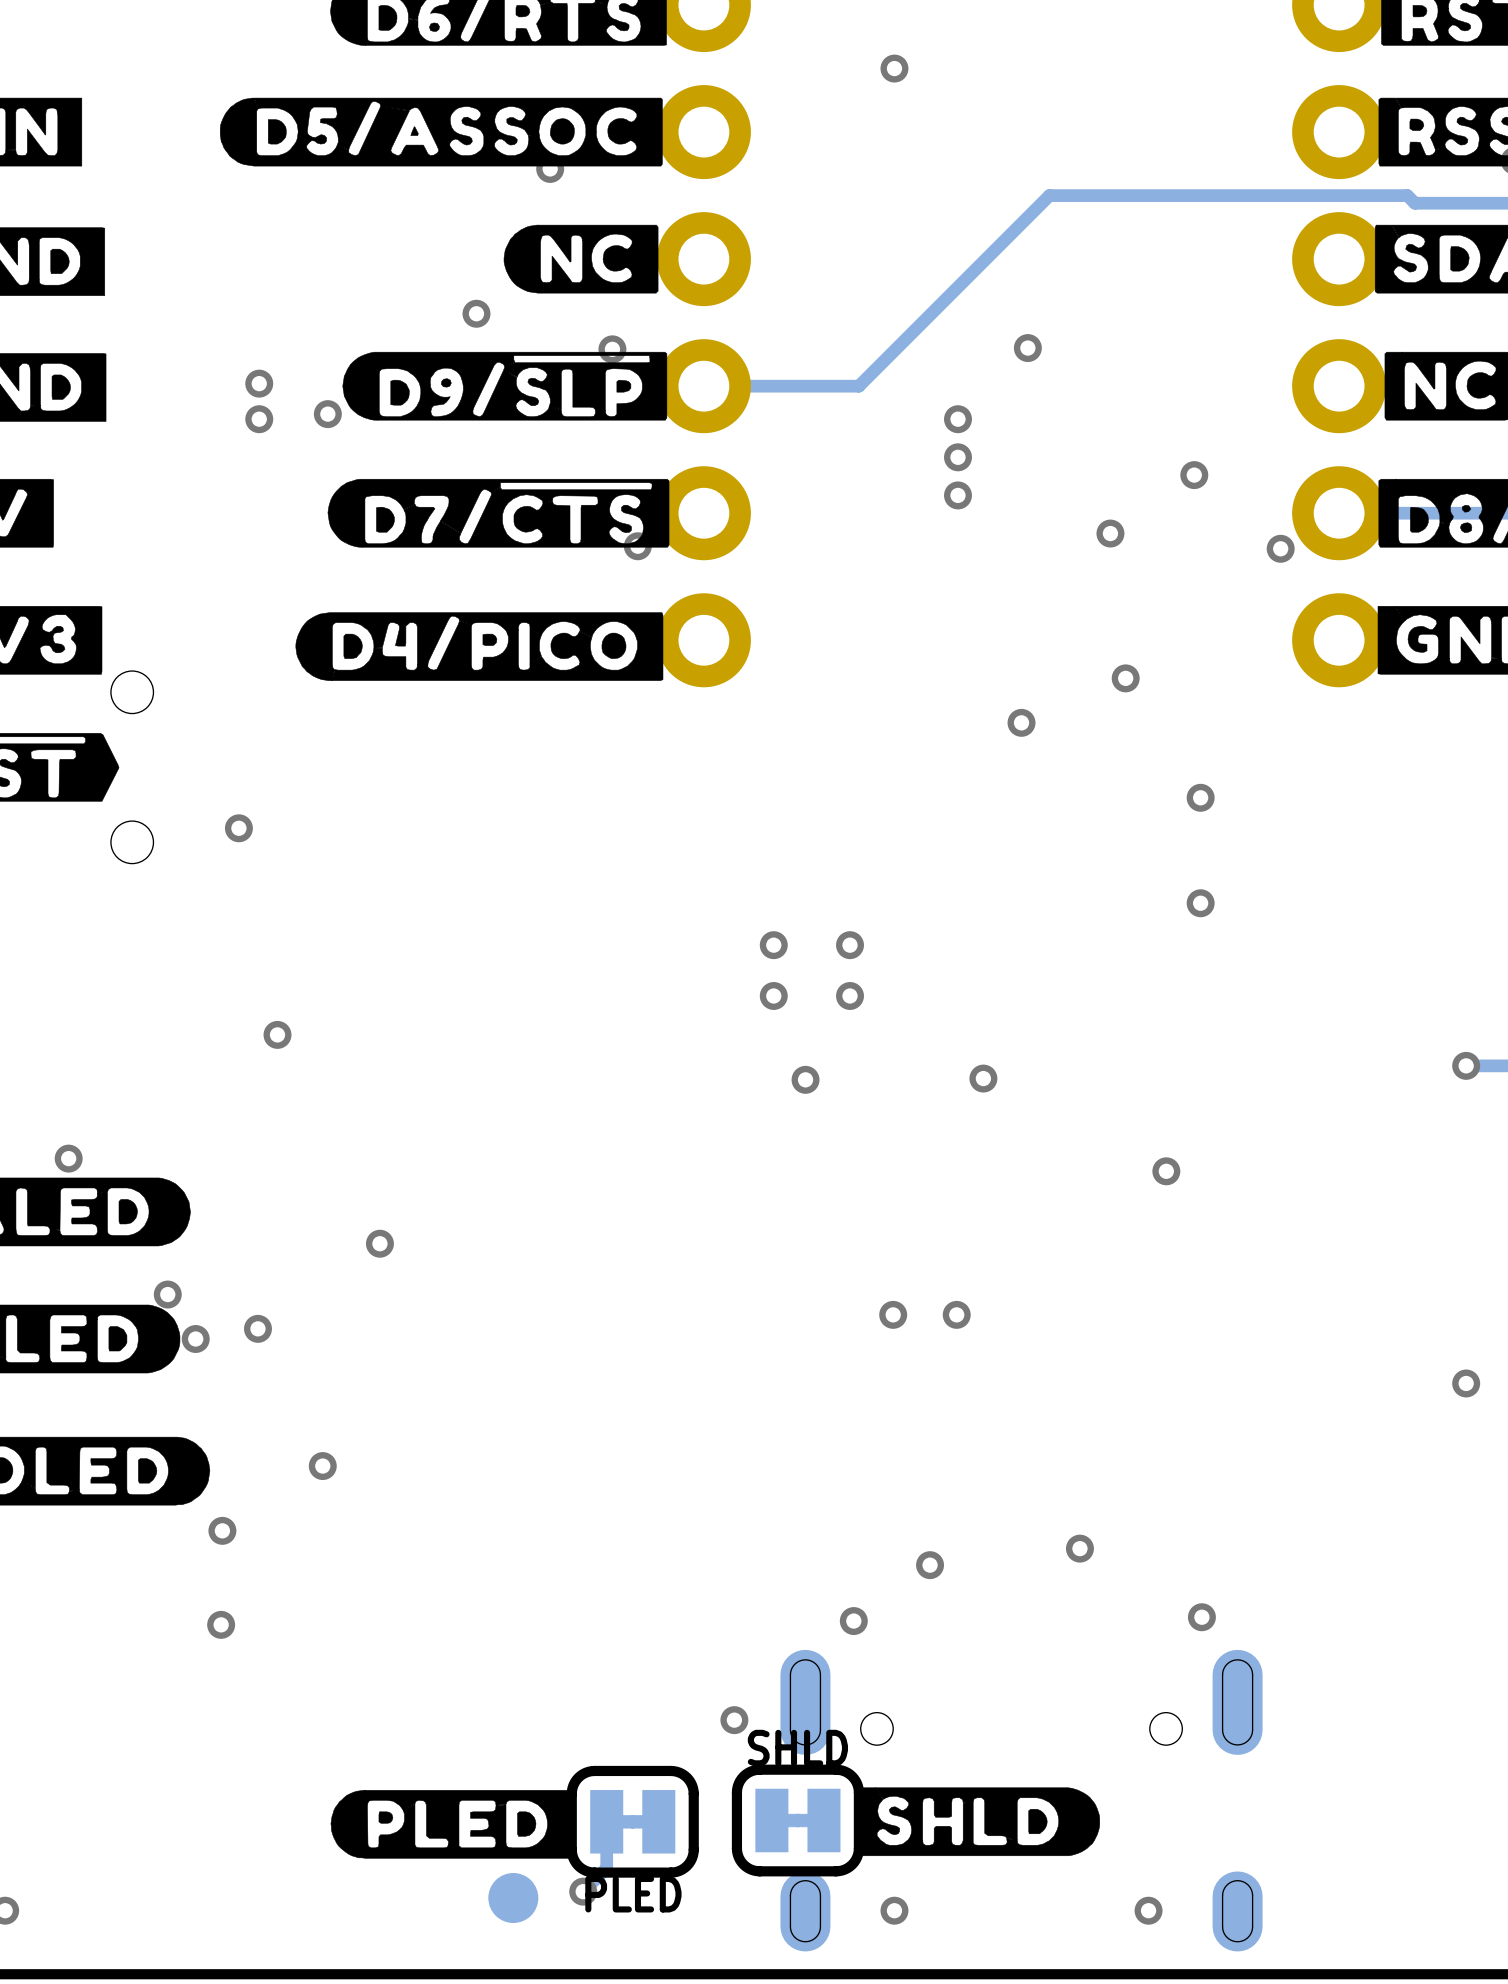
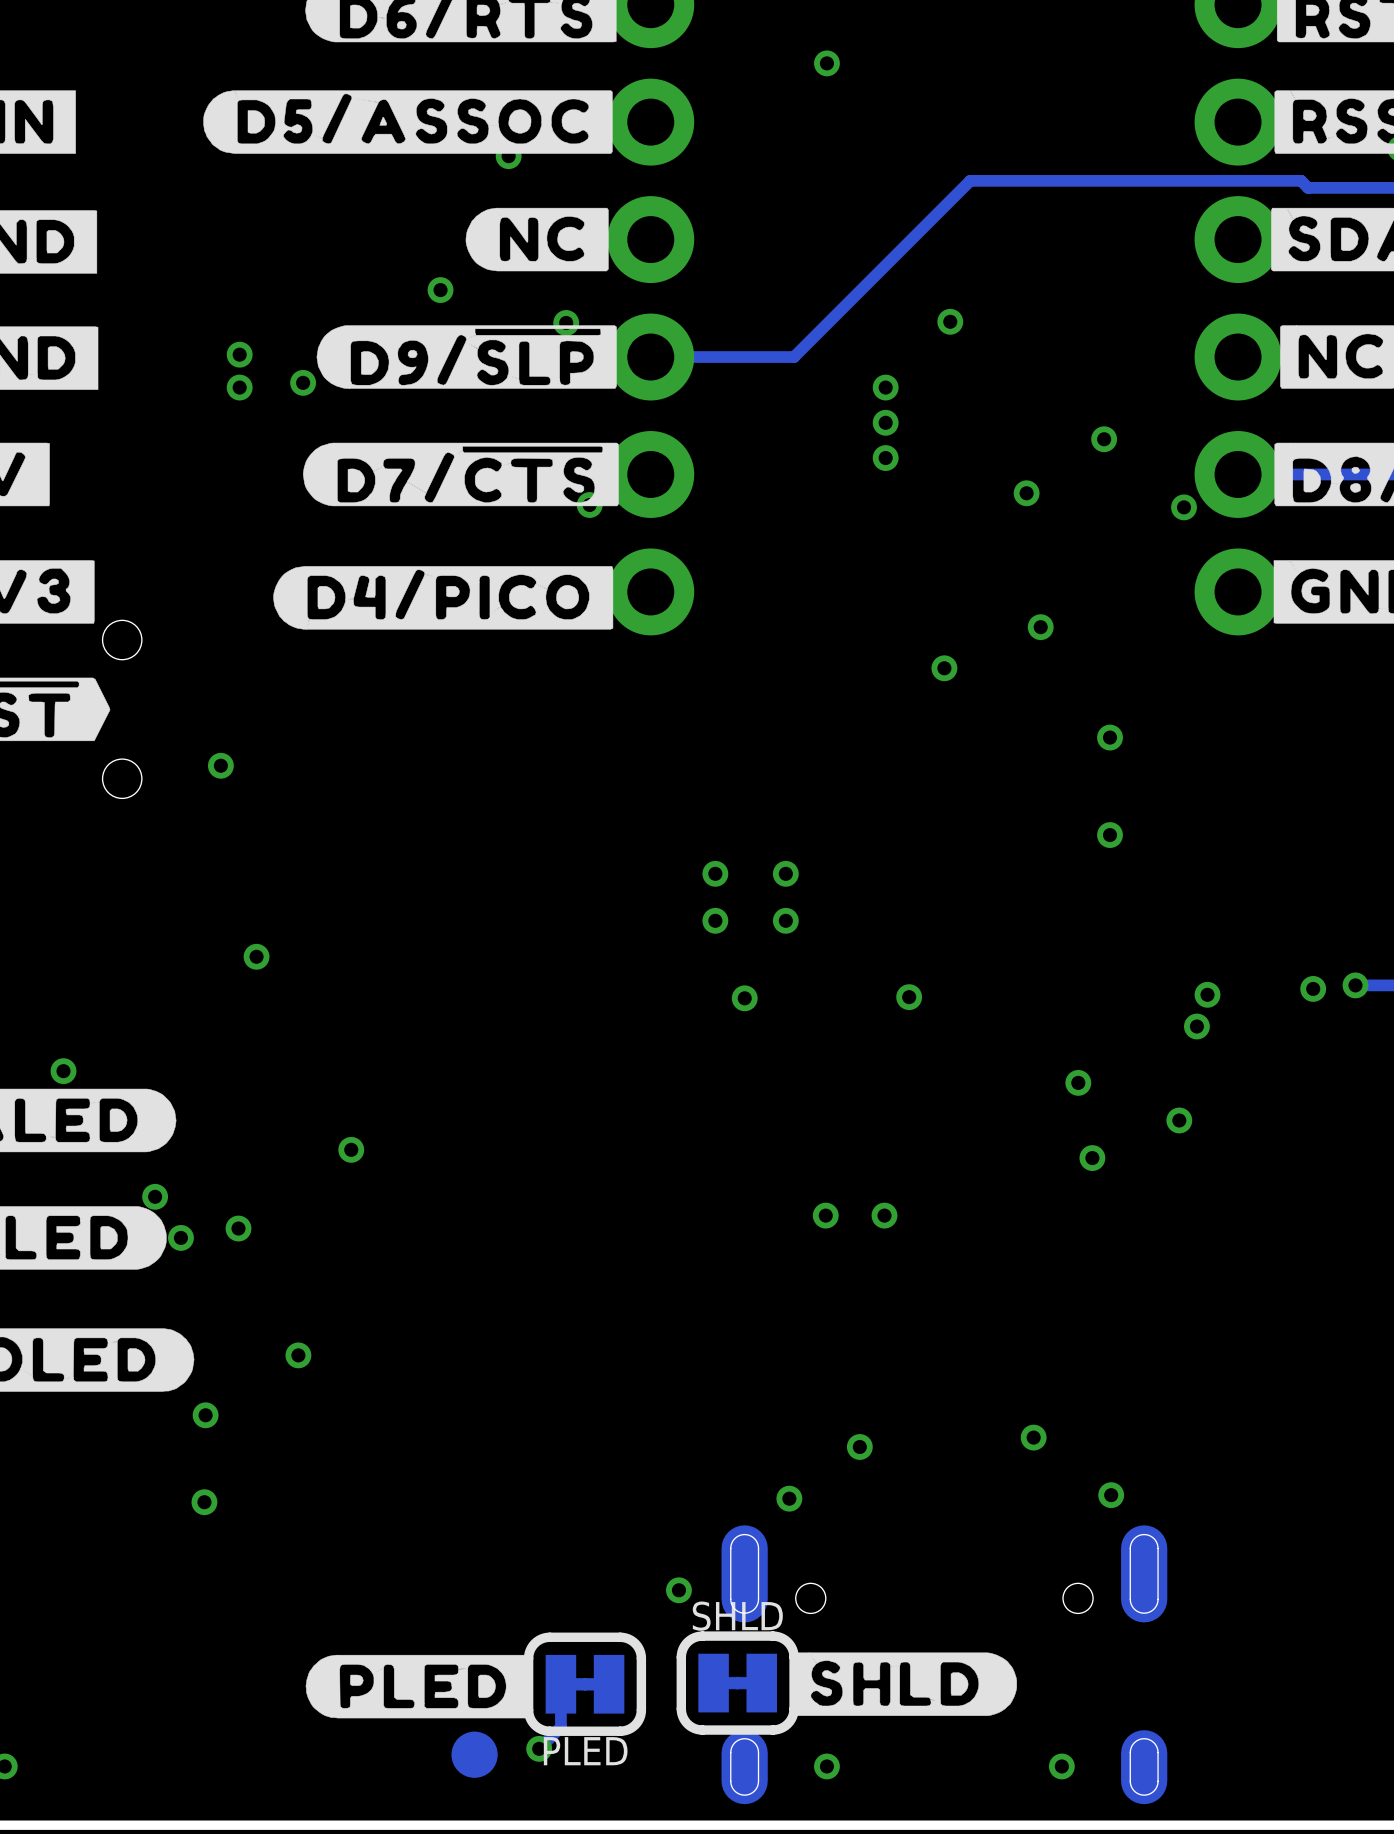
via: none -> (1313, 988)
via: none -> (1207, 994)
via: none -> (1196, 1026)
via: none -> (1179, 1120)
via: none -> (1092, 1158)
via: (1466, 1383) -> none
via position: (1079, 1548) -> (1033, 1437)

